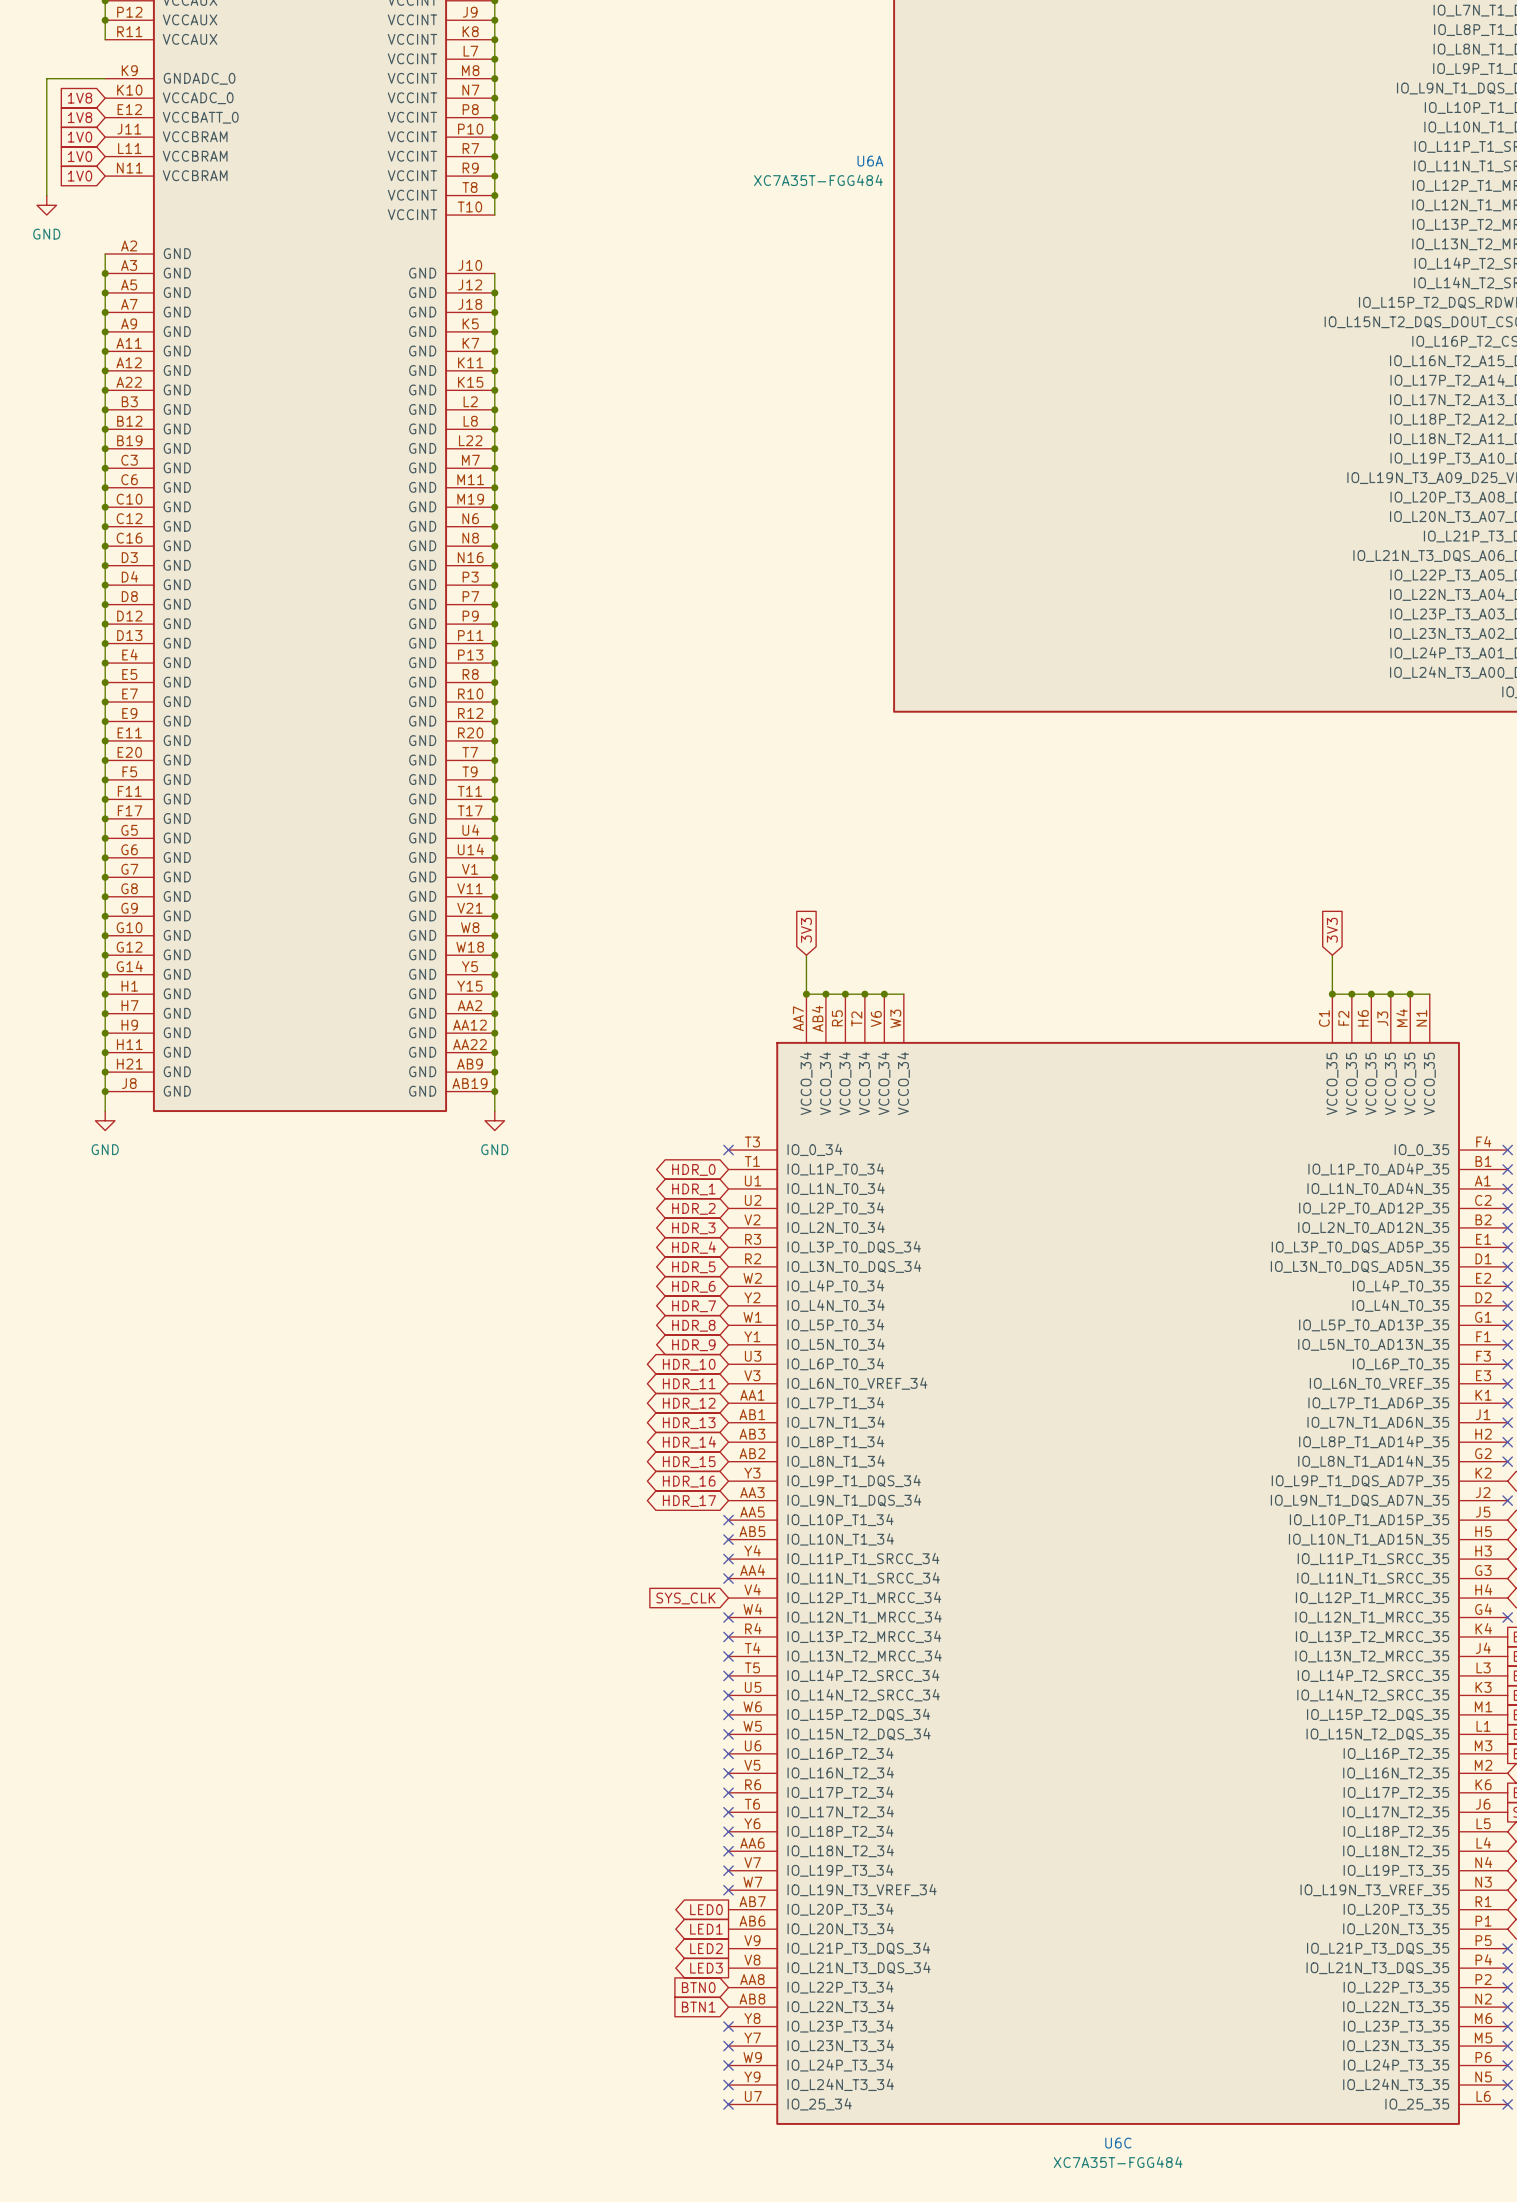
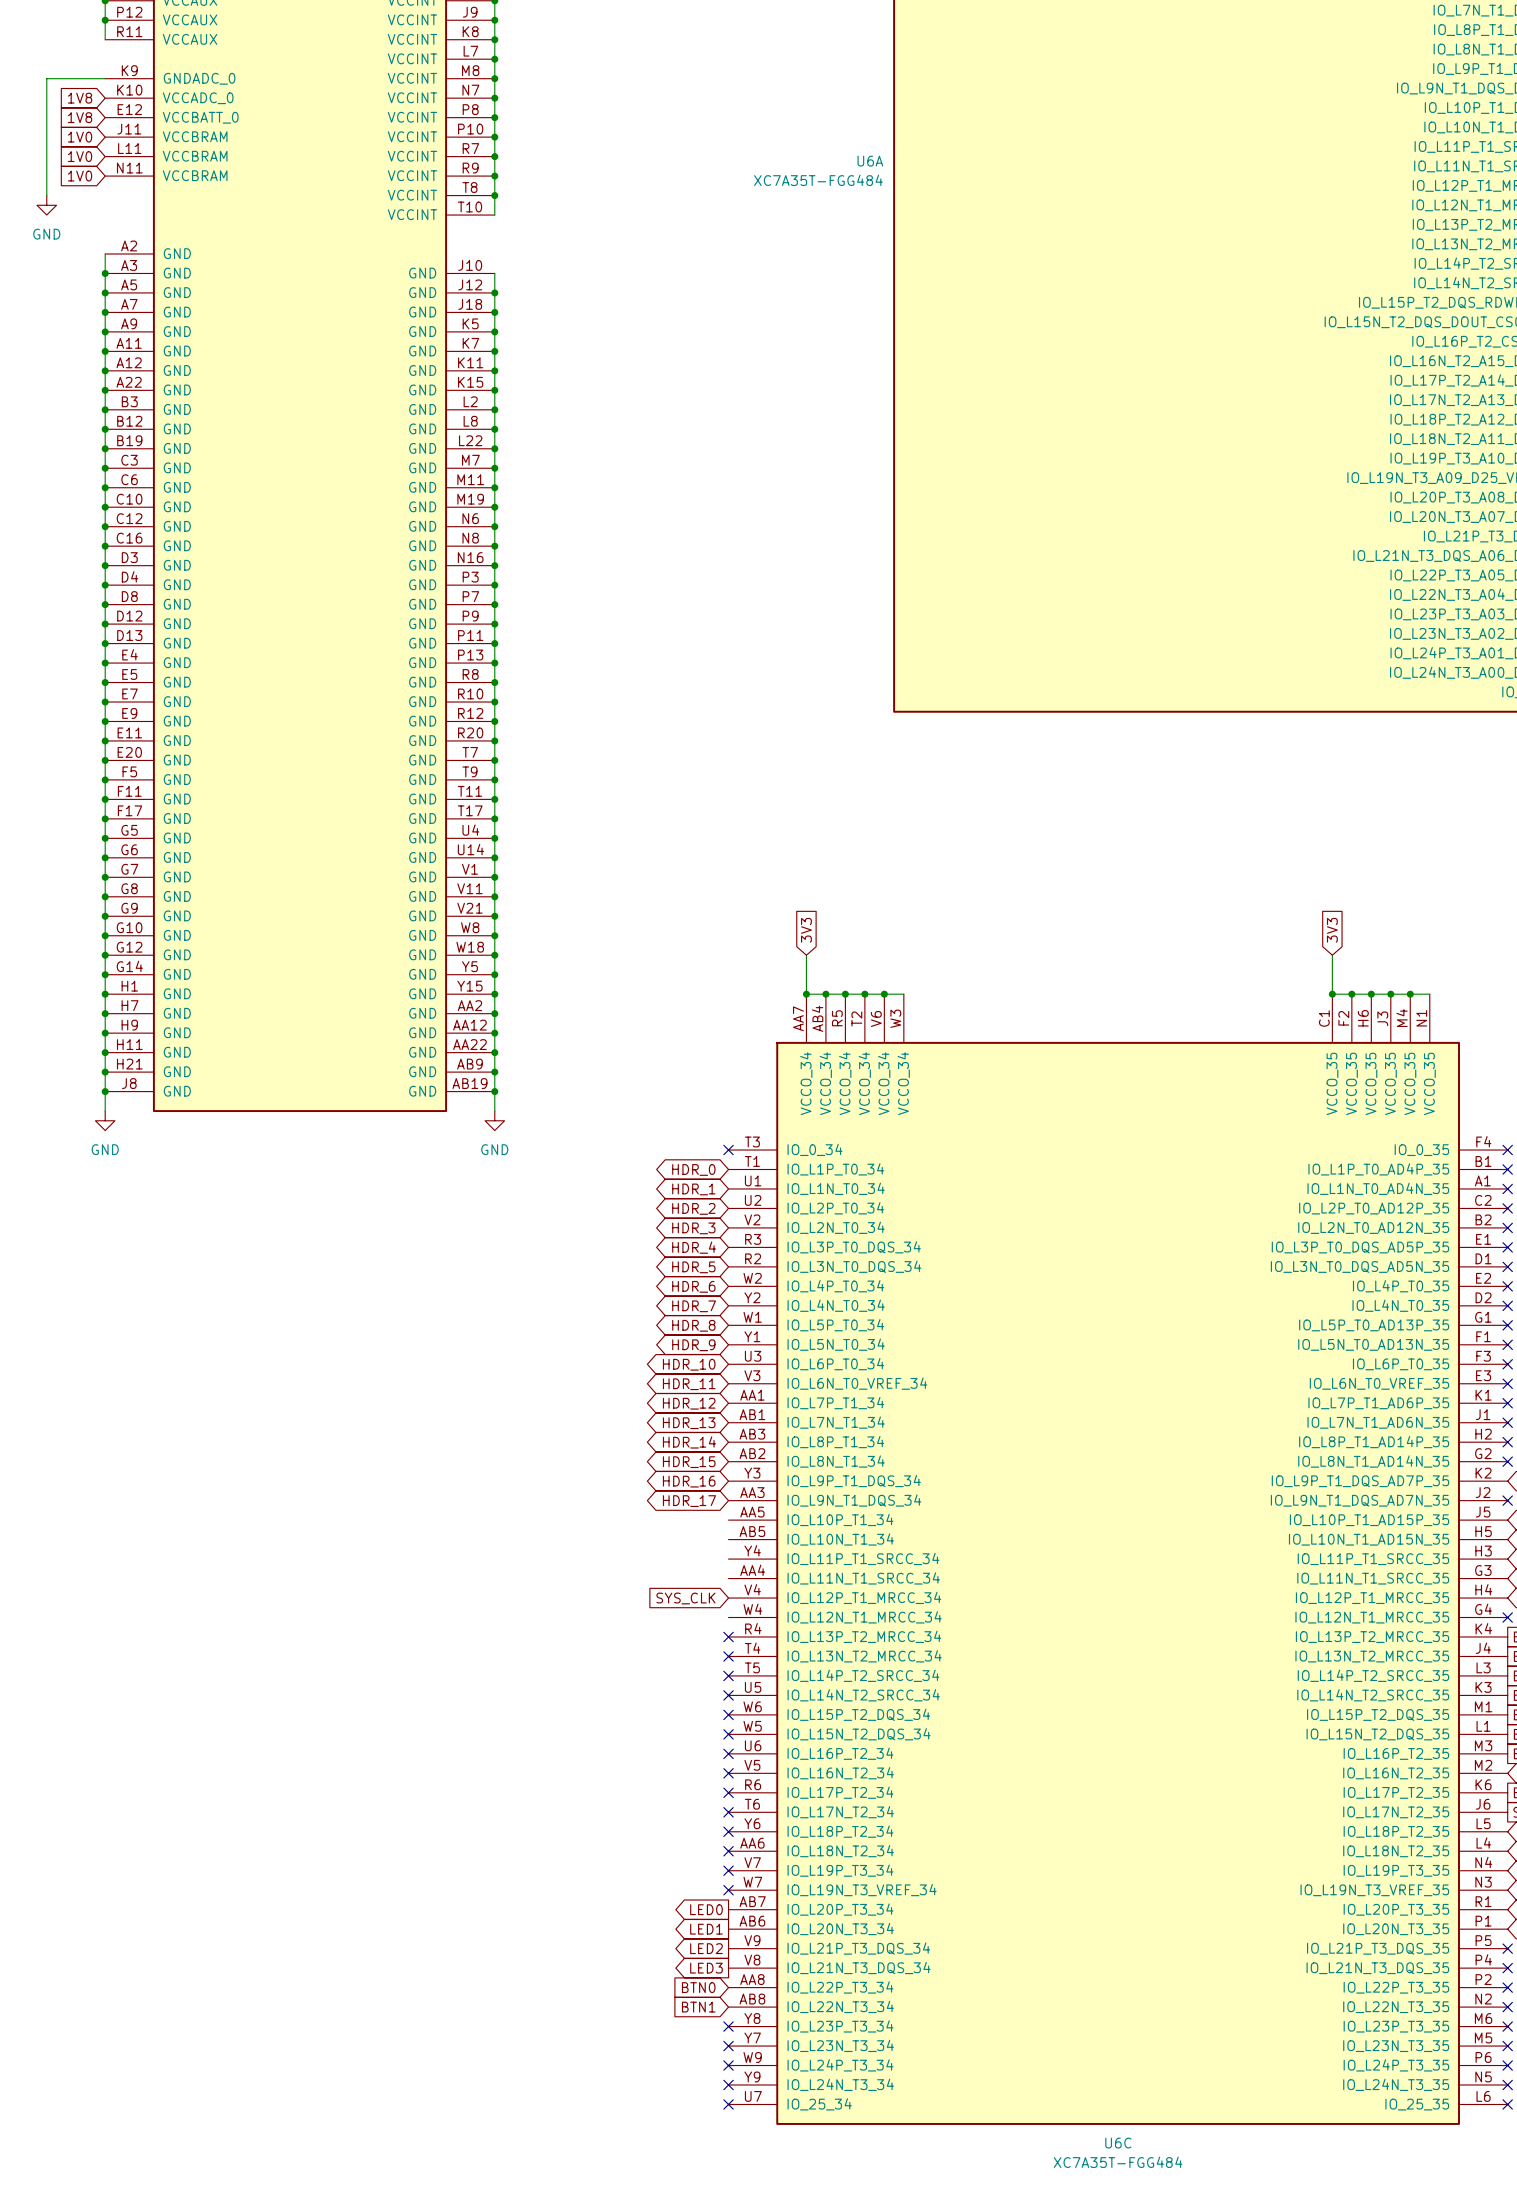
no-connect mark: (728, 1520) -> none
no-connect mark: (728, 1539) -> none
no-connect mark: (728, 1559) -> none
no-connect mark: (728, 1578) -> none
no-connect mark: (728, 1617) -> none

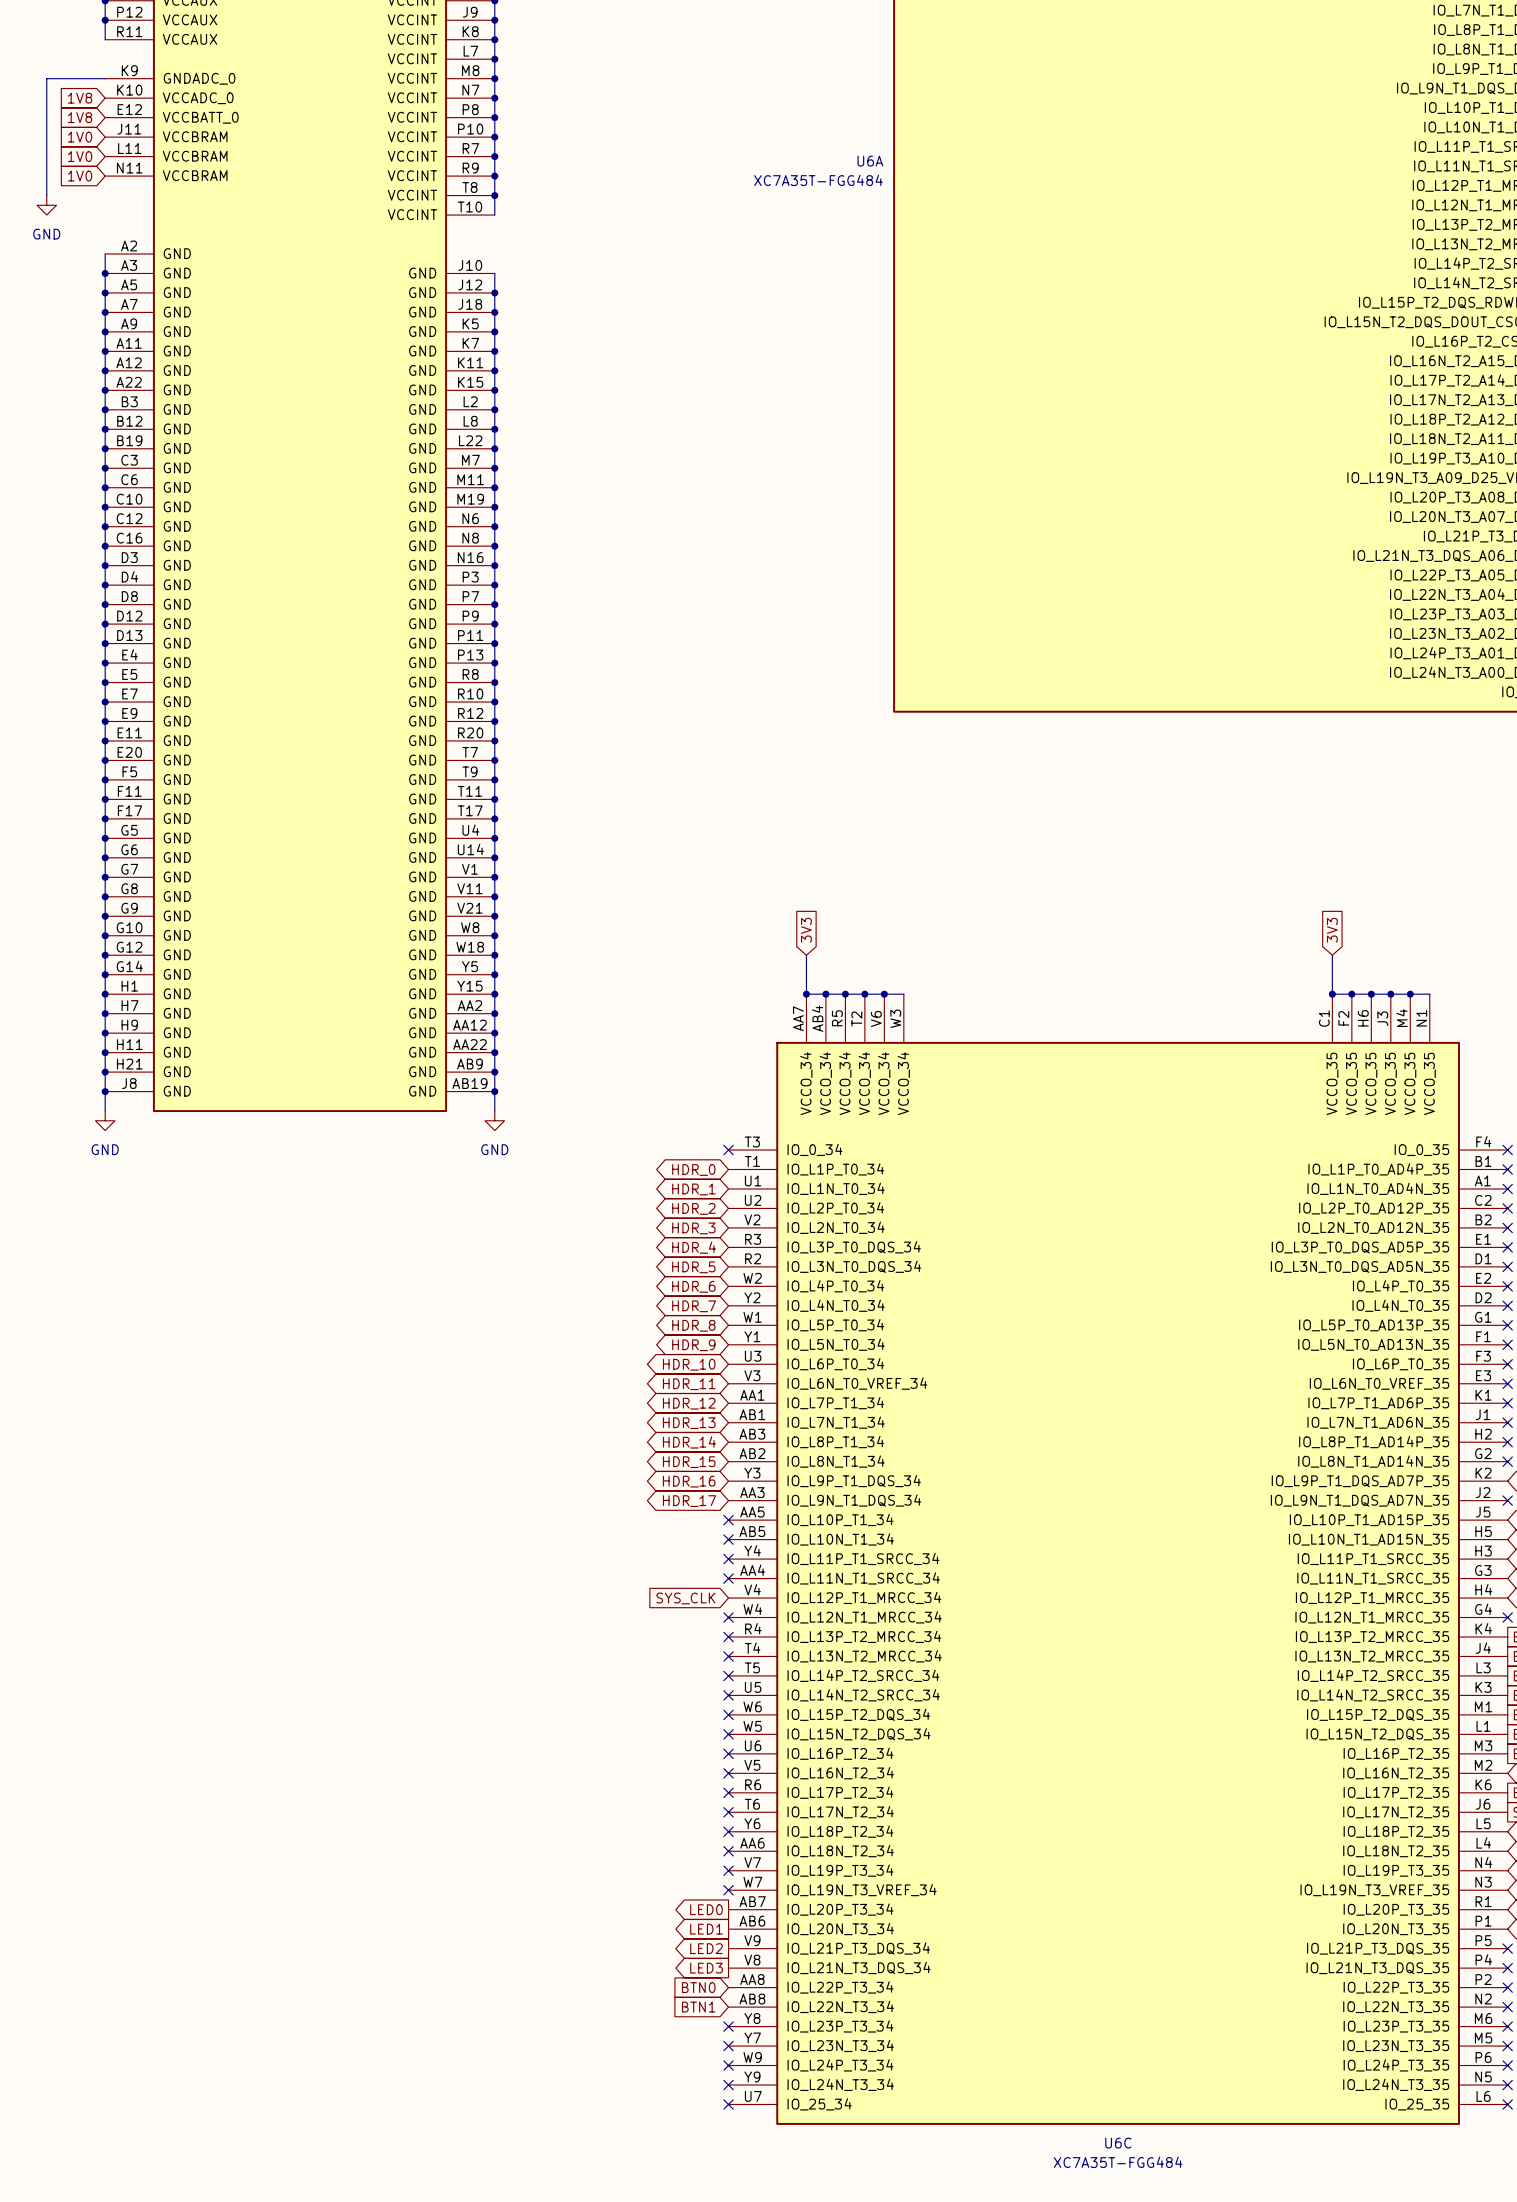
no-connect mark: none -> (728, 1520)
no-connect mark: none -> (728, 1539)
no-connect mark: none -> (728, 1559)
no-connect mark: none -> (728, 1578)
no-connect mark: none -> (728, 1617)

